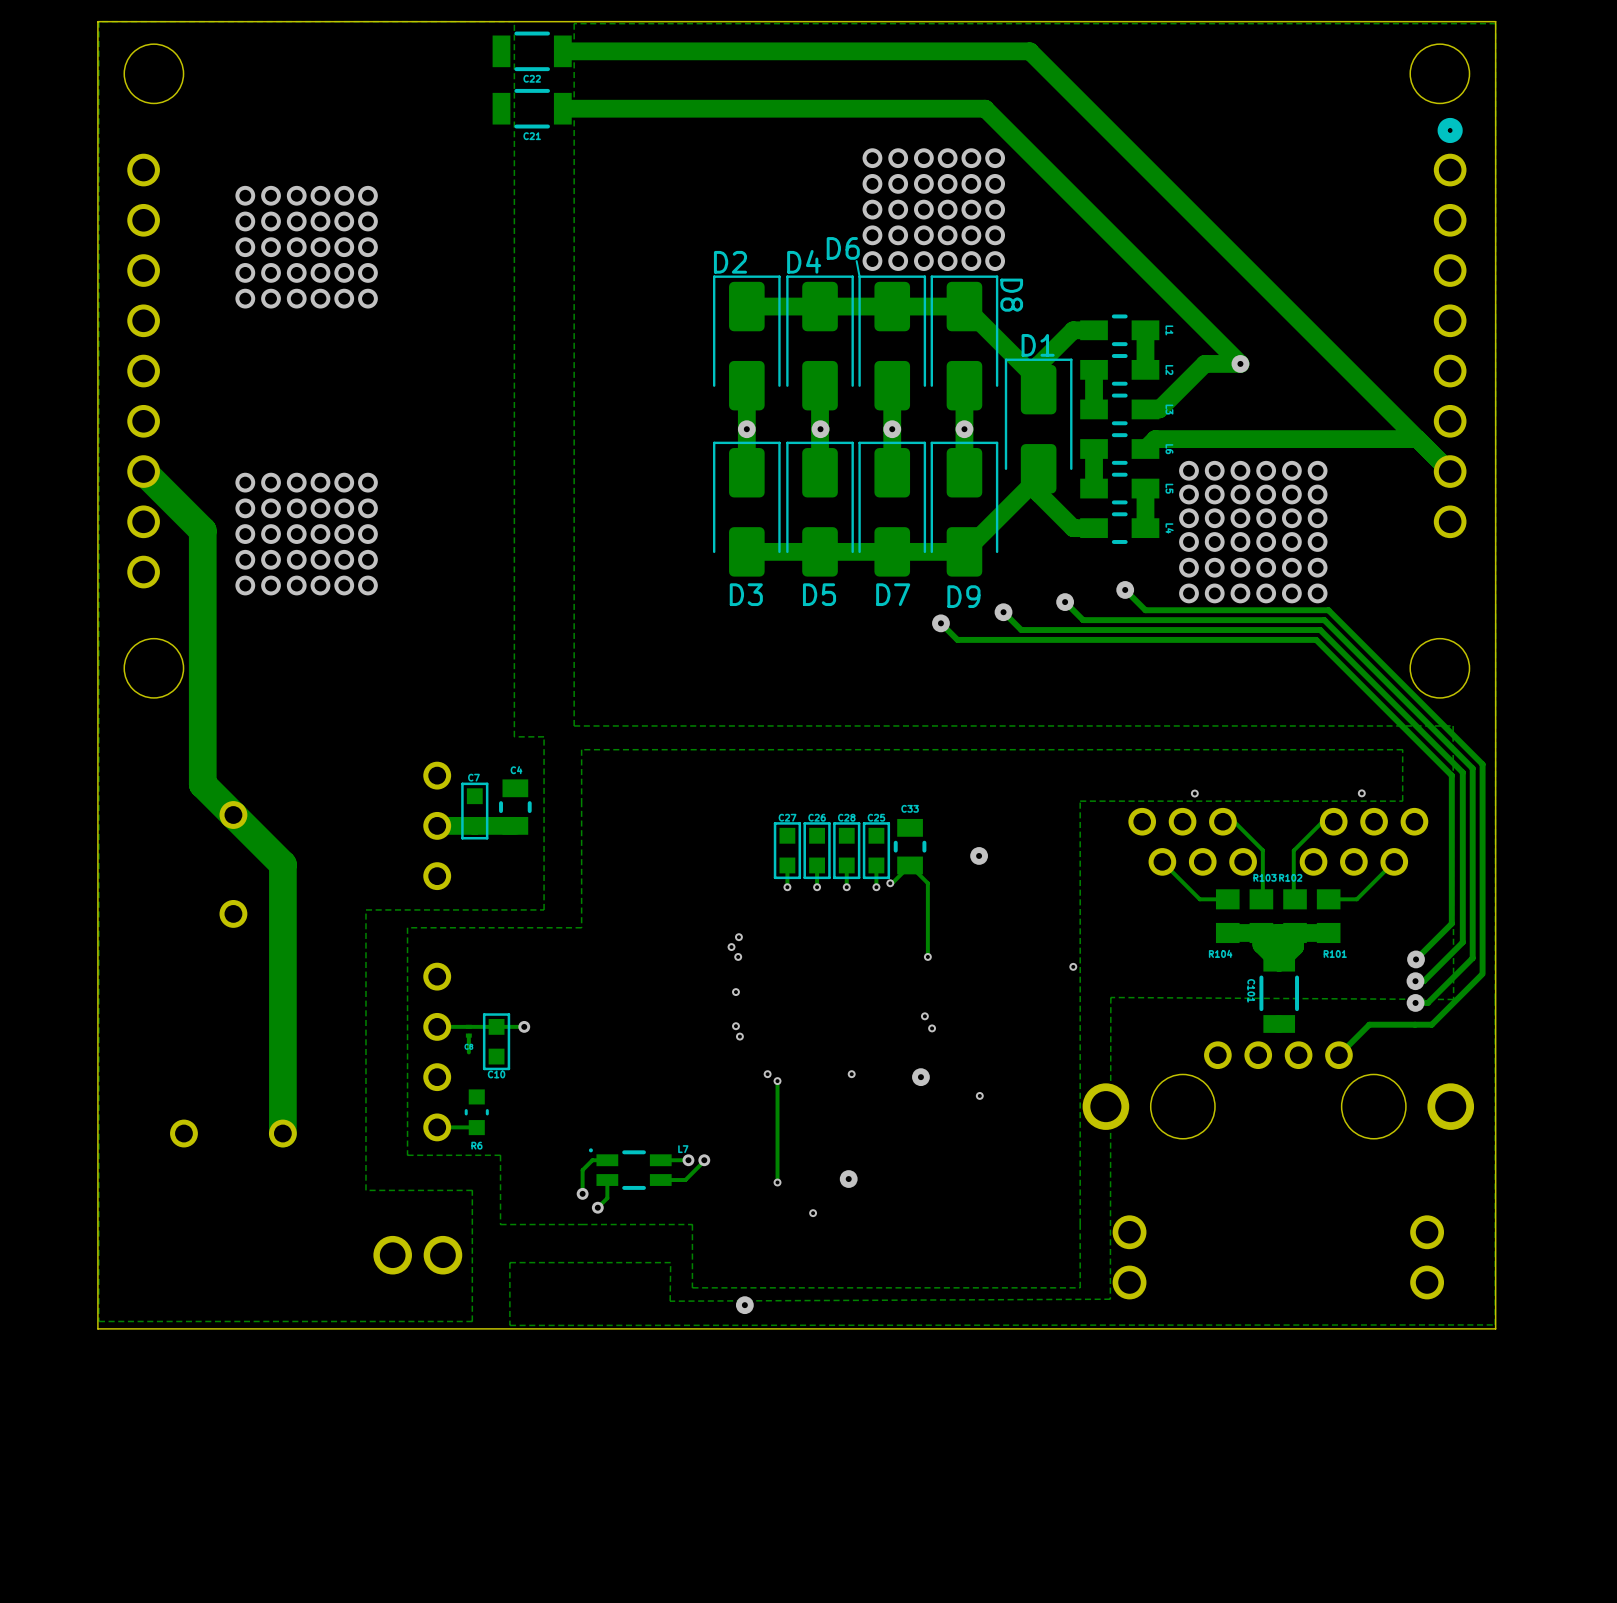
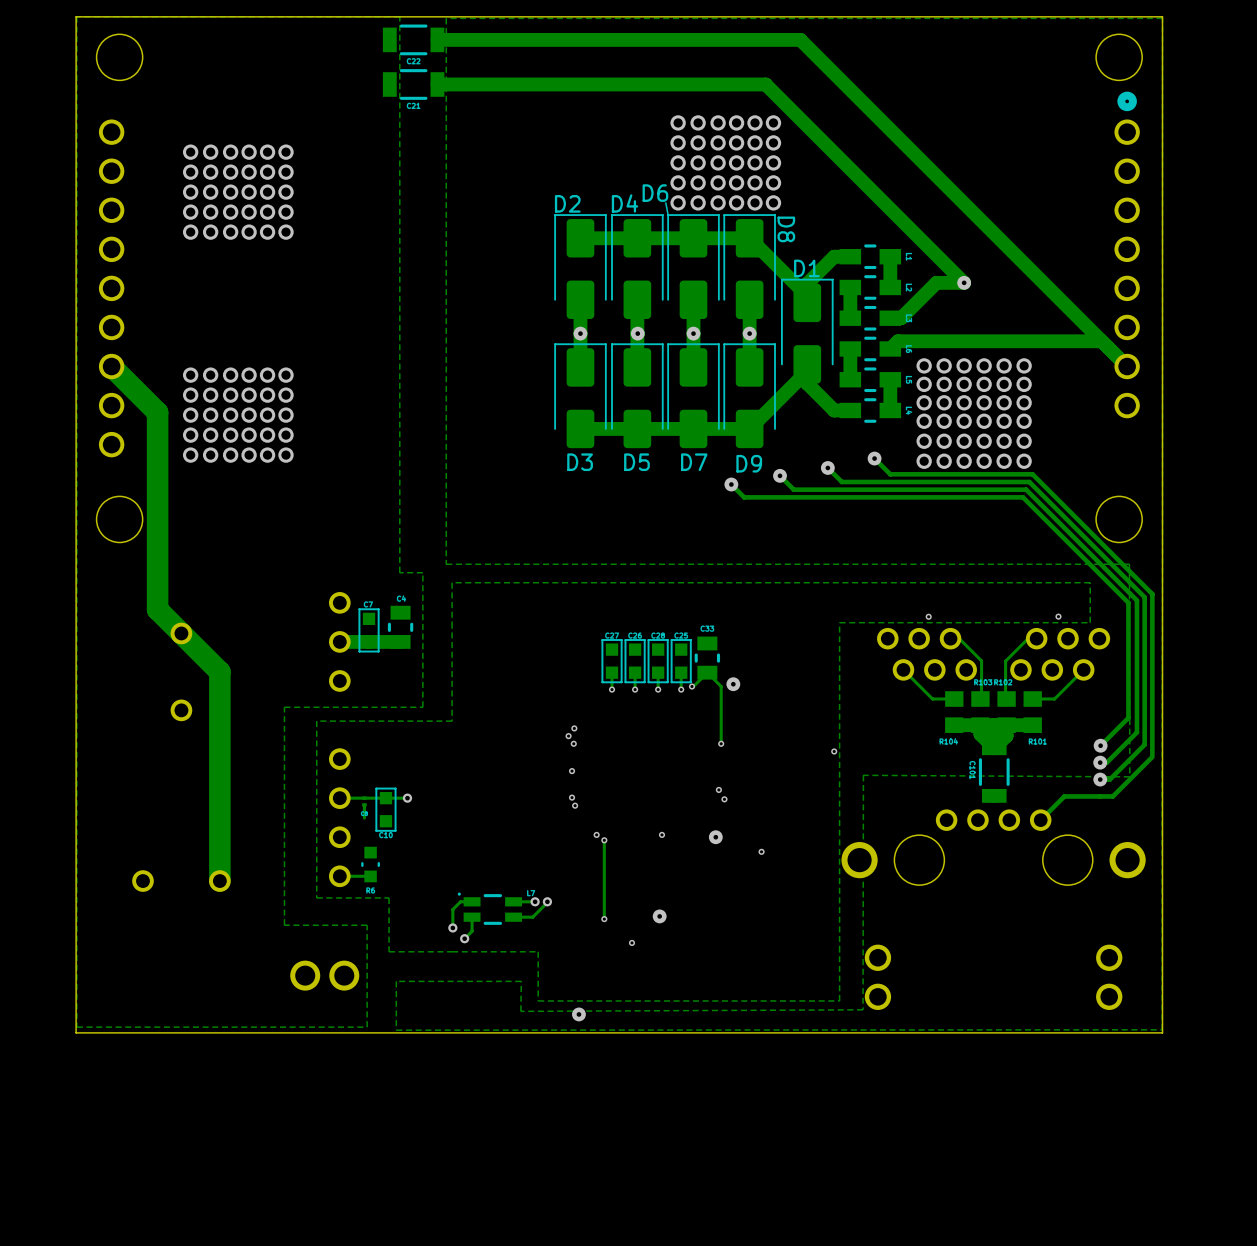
via position: (979, 855) -> (733, 684)

